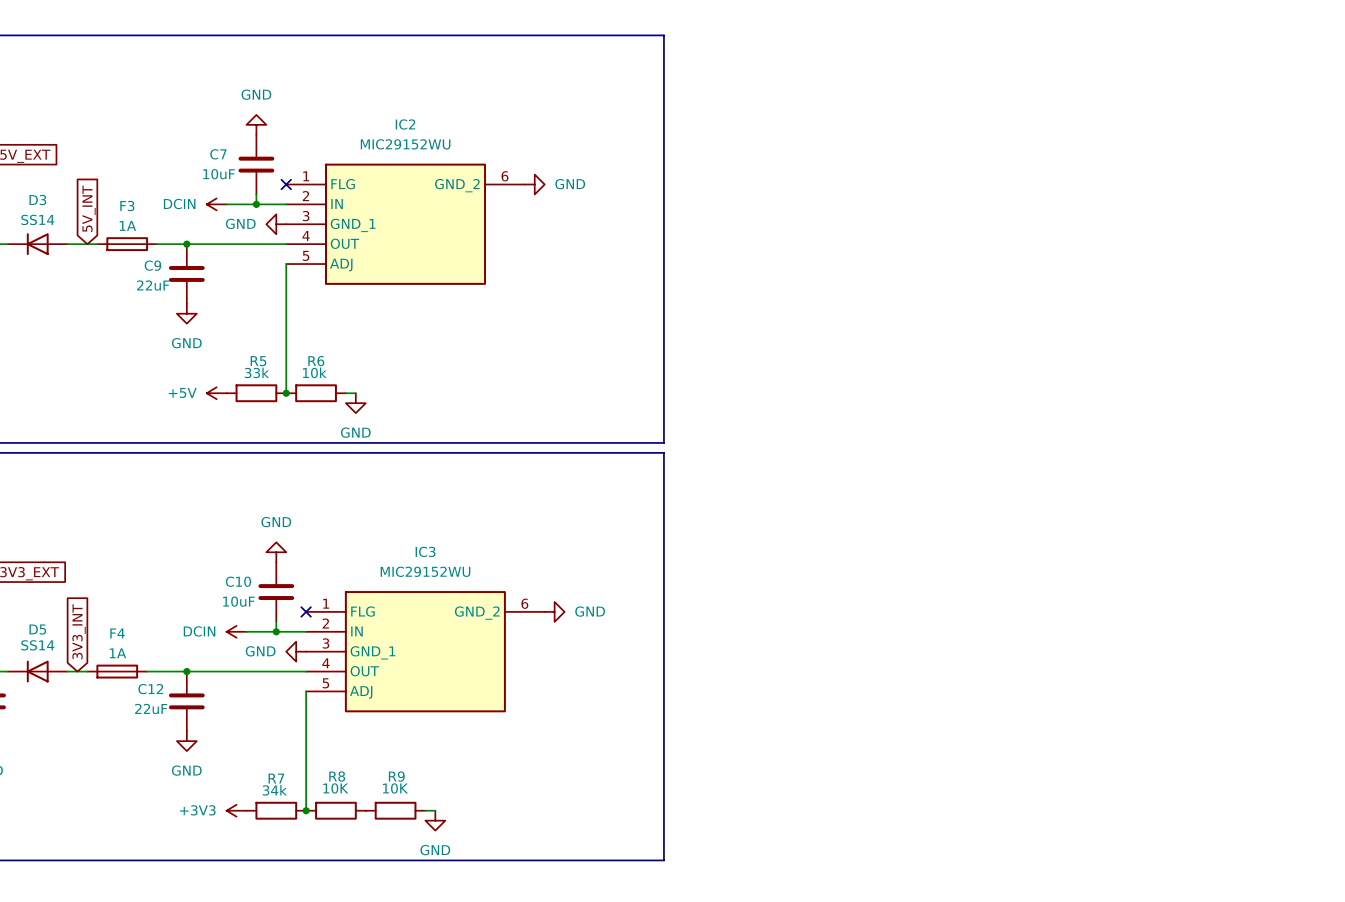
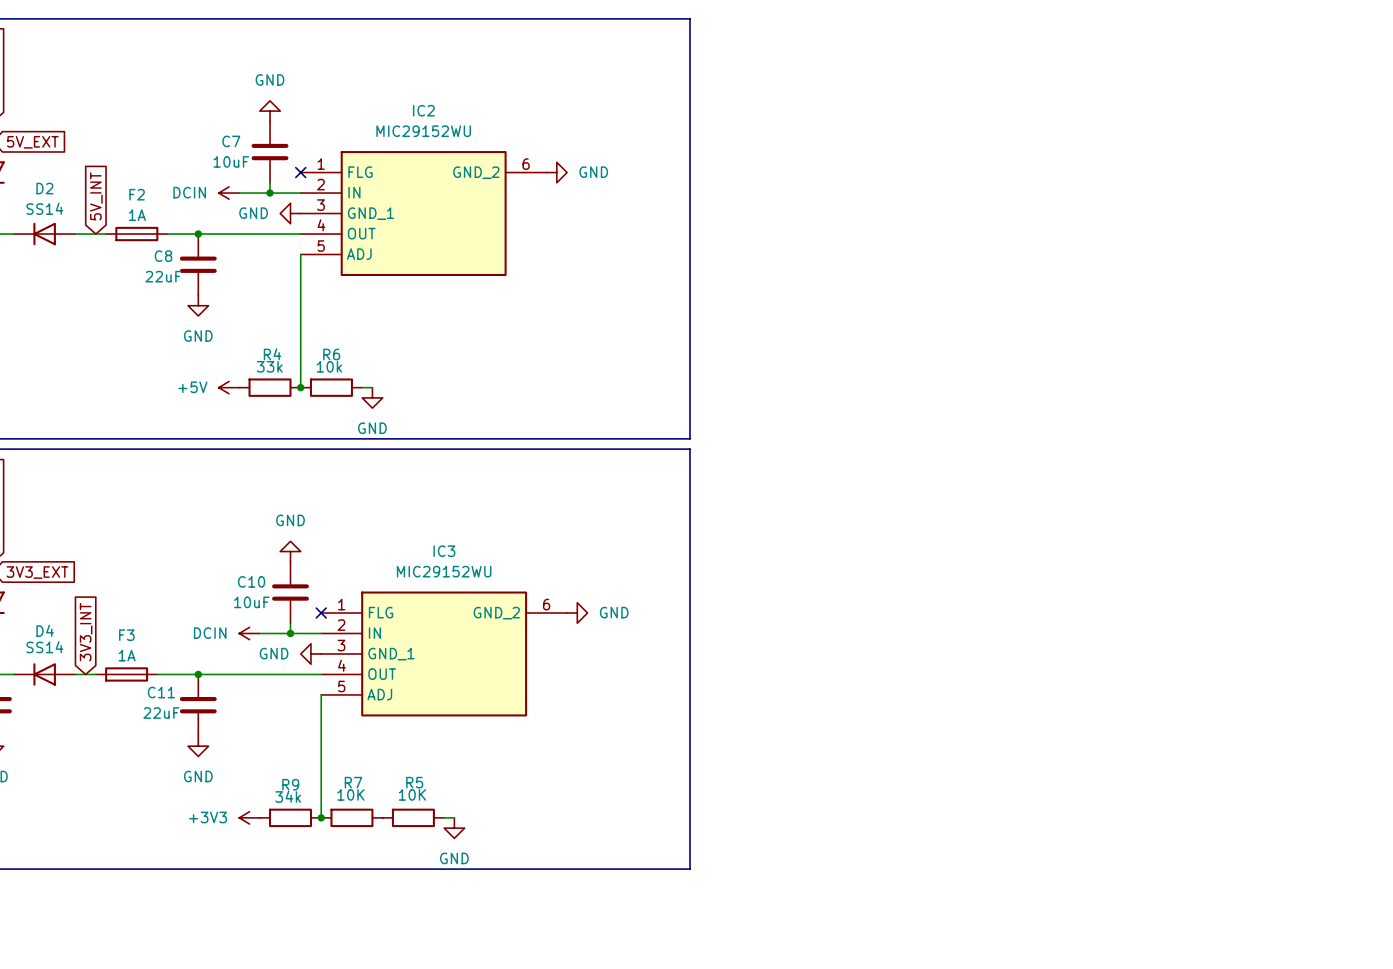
D3 name: D3 (37, 200) -> D2 (44, 188)
F3 name: F3 (127, 206) -> F2 (137, 194)
C9 name: C9 (152, 265) -> C8 (163, 256)
R5 name: R5 (258, 361) -> R4 (272, 354)
D5 name: D5 (37, 629) -> D4 (45, 630)
F4 name: F4 (117, 633) -> F3 (126, 635)
C12 name: C12 (150, 689) -> C11 (161, 692)
R8 name: R8 (337, 776) -> R7 (353, 782)
R9 name: R9 (396, 776) -> R5 (414, 782)
R7 name: R7 (276, 778) -> R9 (290, 784)

